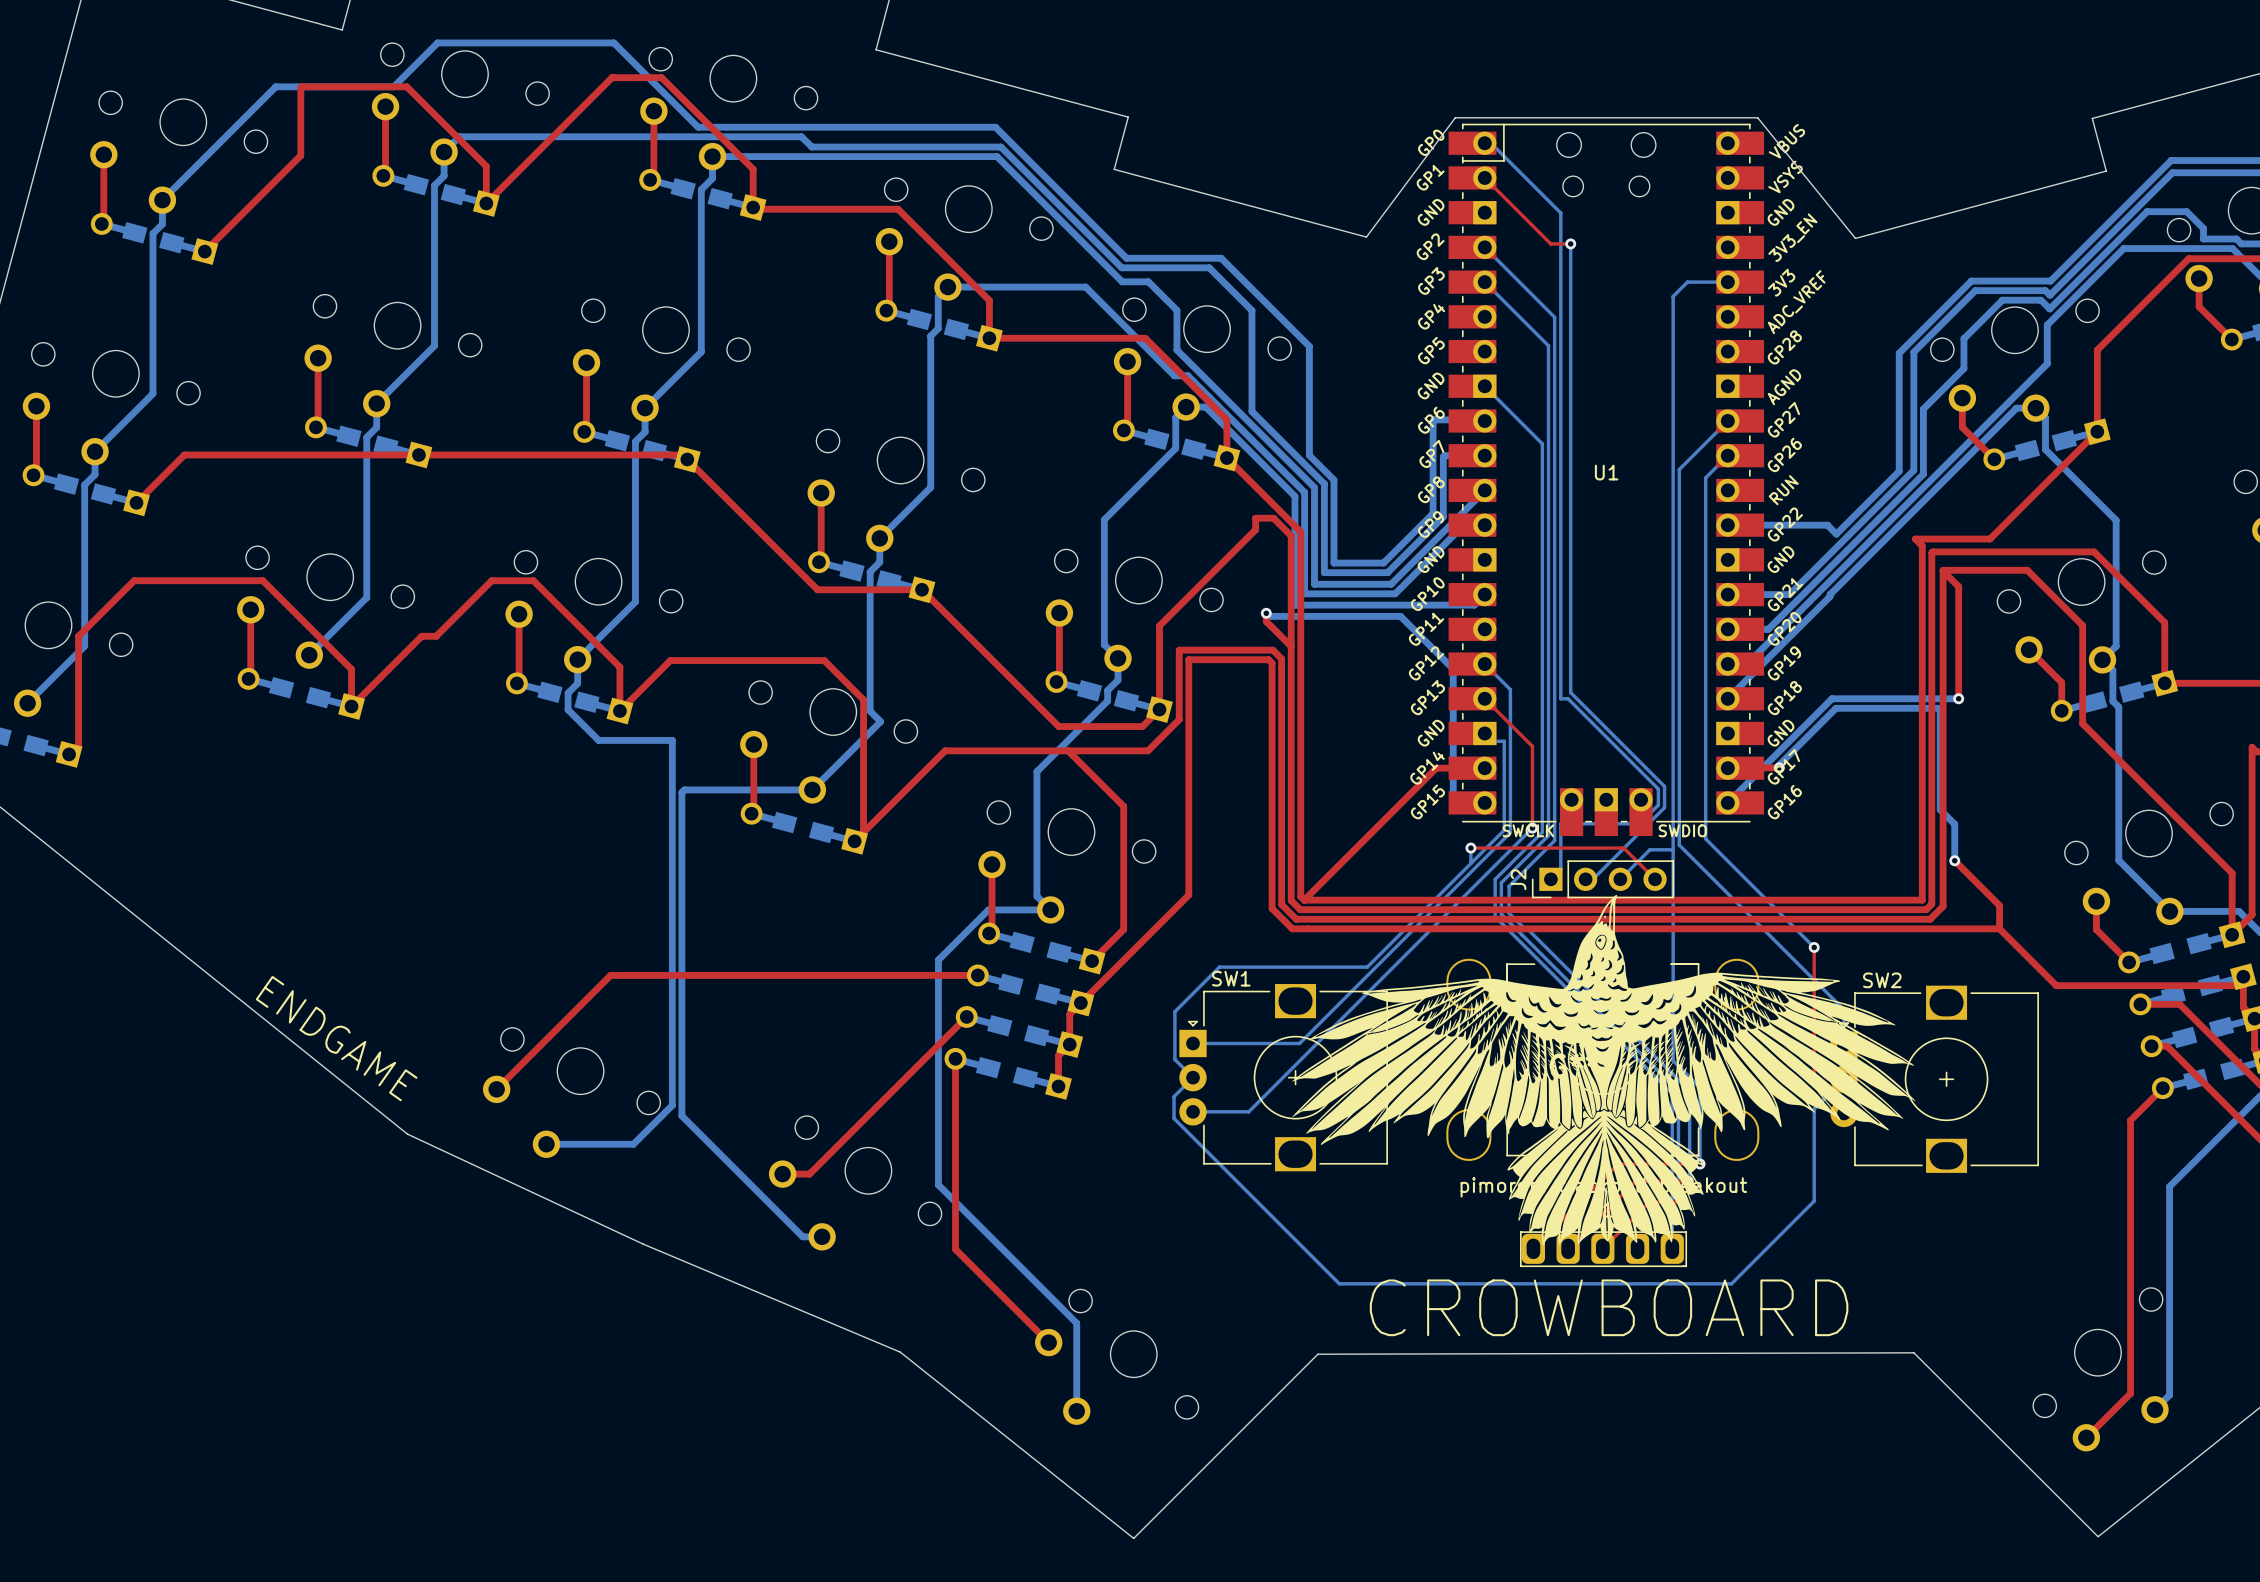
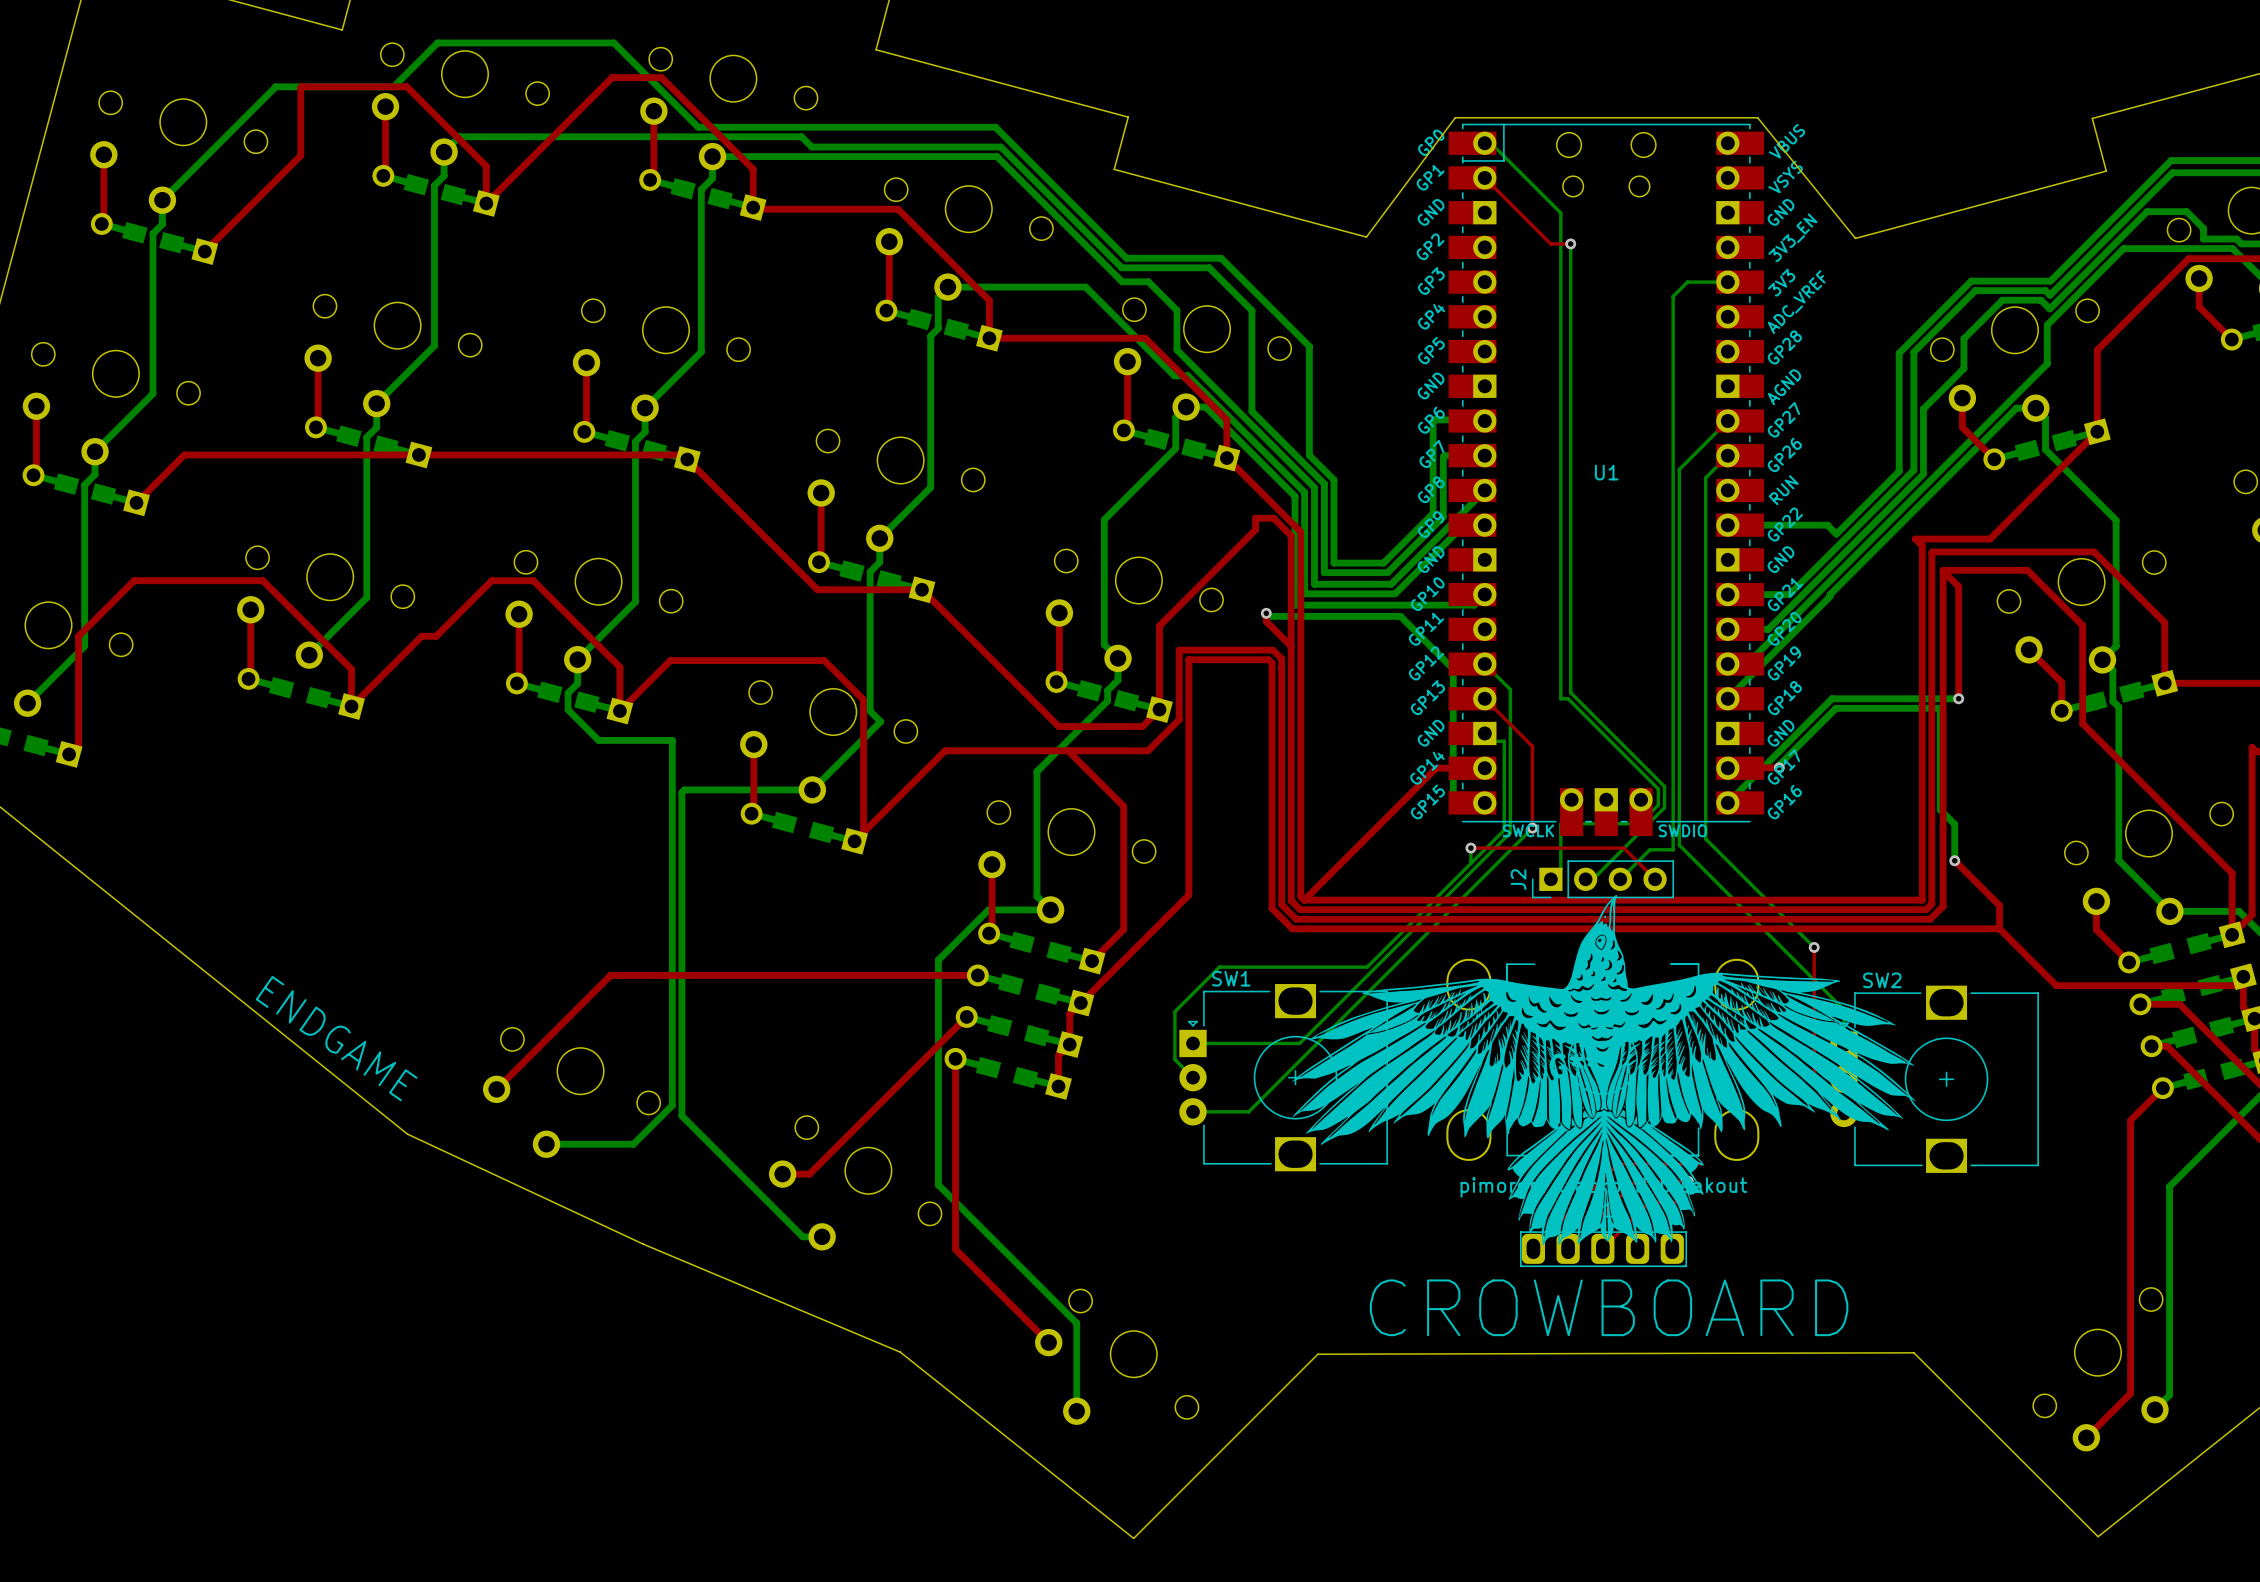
bottom track: (1484, 247) (1554, 317) (1554, 840) (1509, 886) (1509, 913) (1523, 927) (1526, 927) (1689, 1091) (1688, 1181) -> none
bottom track: (1484, 282) (1548, 345) (1548, 835) (1501, 882) (1501, 914) (1678, 1091) (1678, 1197) (1682, 1202) -> none
bottom track: (1484, 386) (1542, 443) (1542, 832) (1495, 879) (1495, 916) (1672, 1093) (1672, 1248) -> none
bottom track: (1673, 849) (1673, 1060) (1700, 1087) (1700, 1164) -> none
bottom track: (1193, 1077) (1174, 1096) (1174, 1118) (1339, 1283) (1731, 1283) (1814, 1201) (1814, 1109) (1844, 1079) -> none
via: (1700, 1164) -> none

